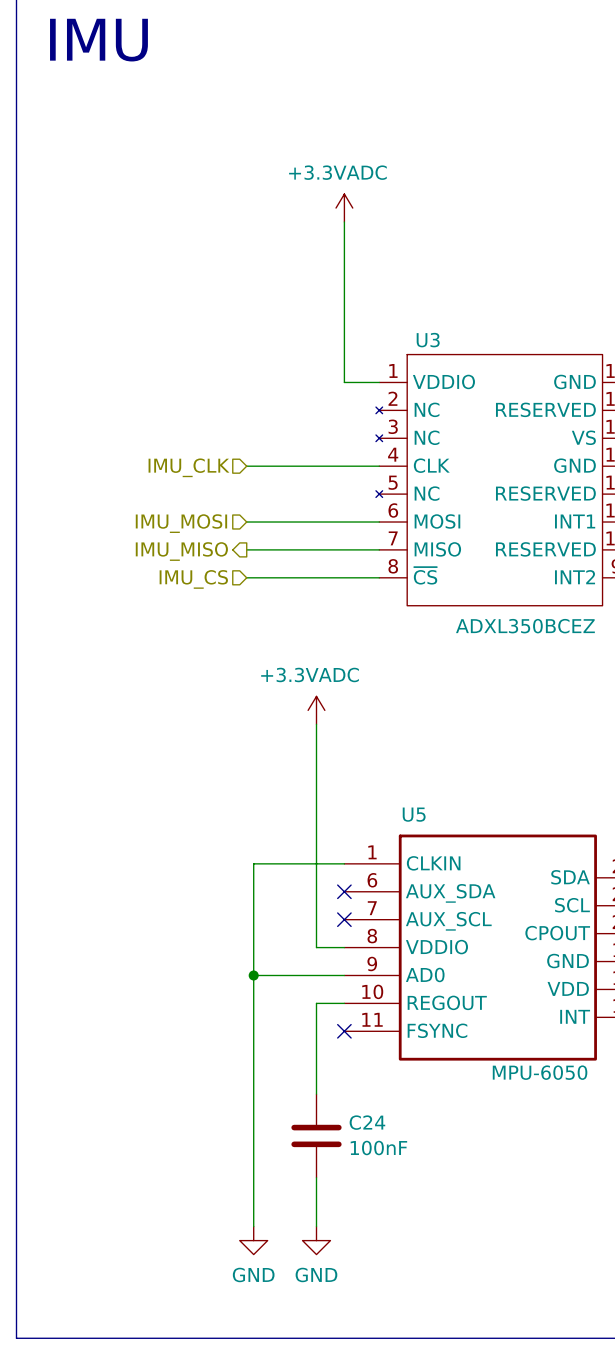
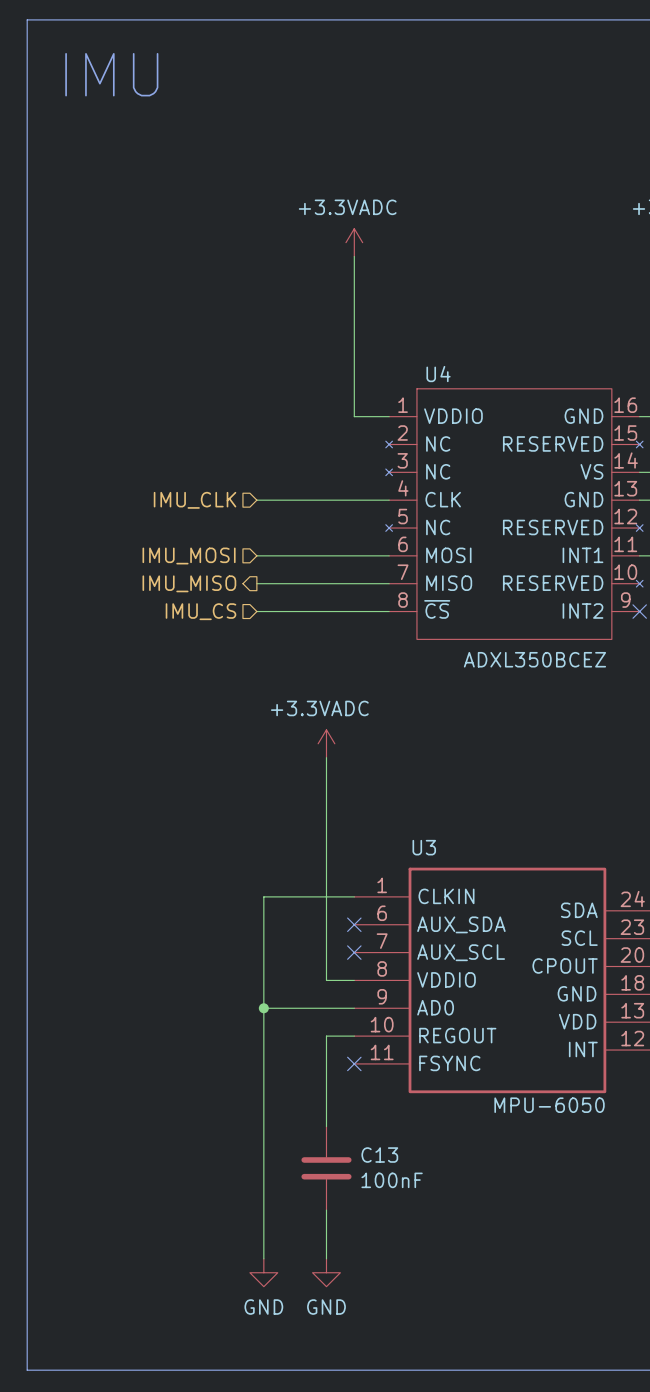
U3 name: U3 (428, 340) -> U4 (438, 374)
U5 name: U5 (414, 814) -> U3 (424, 847)
C24 name: C24 (367, 1122) -> C13 (379, 1155)

